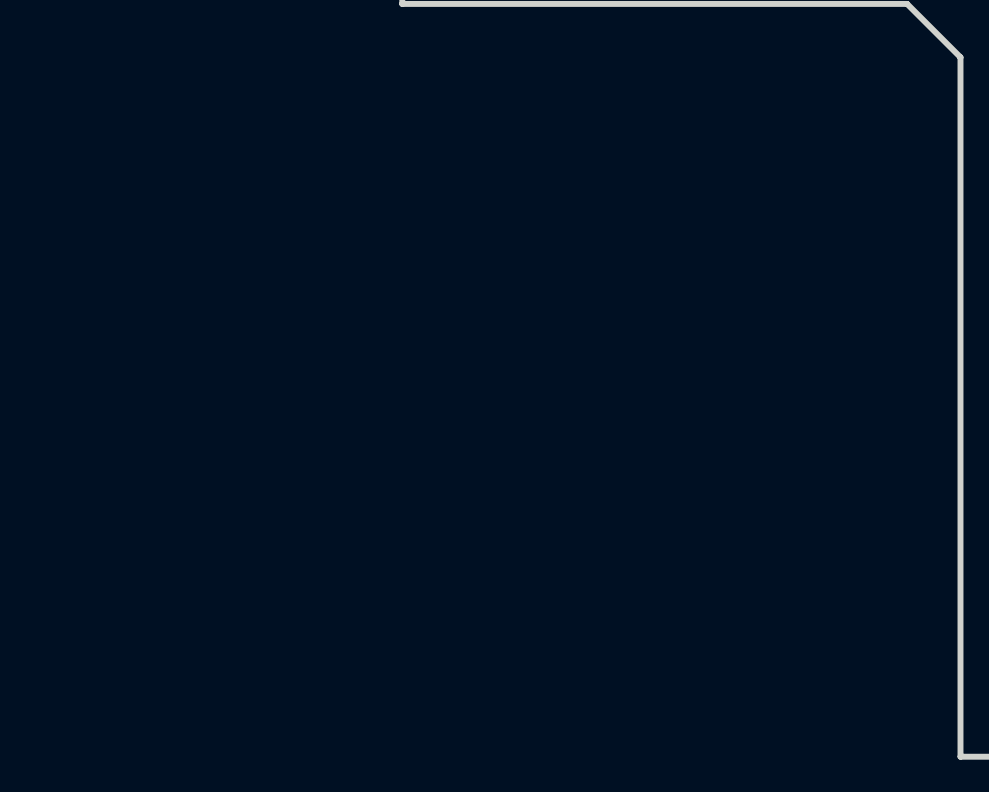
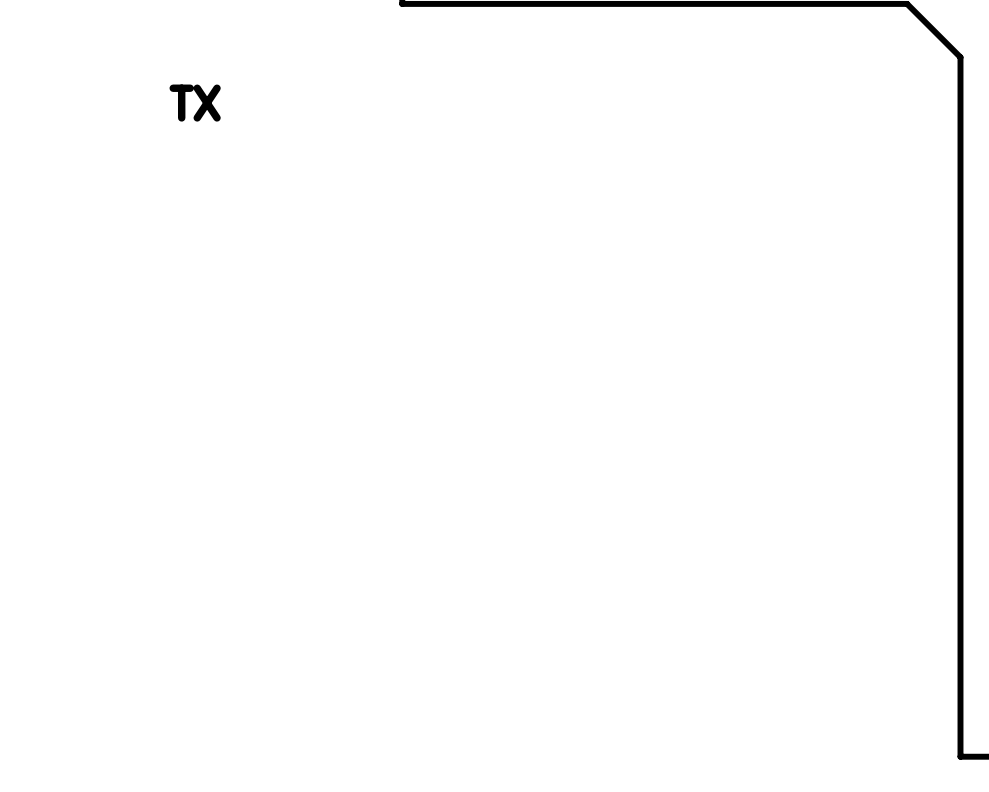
text: none -> TX (195, 103)

